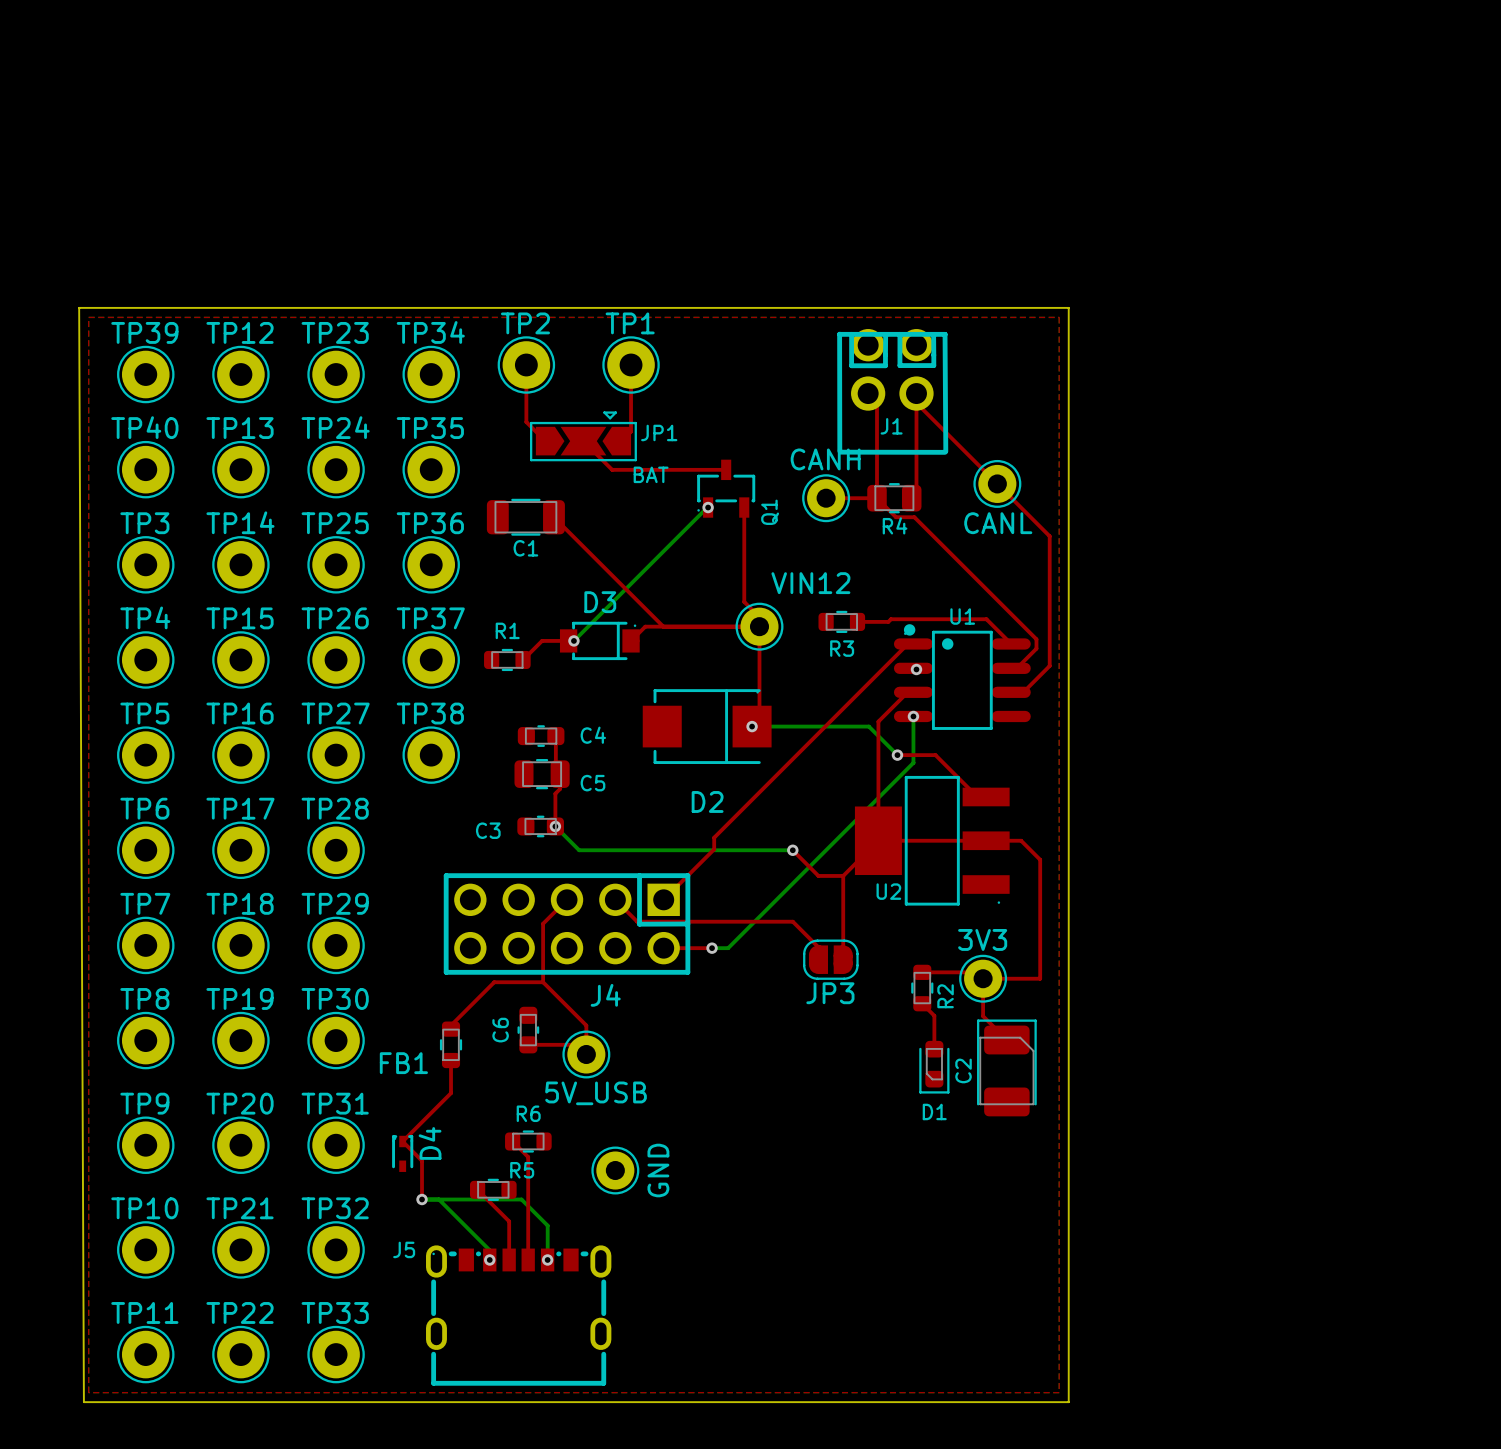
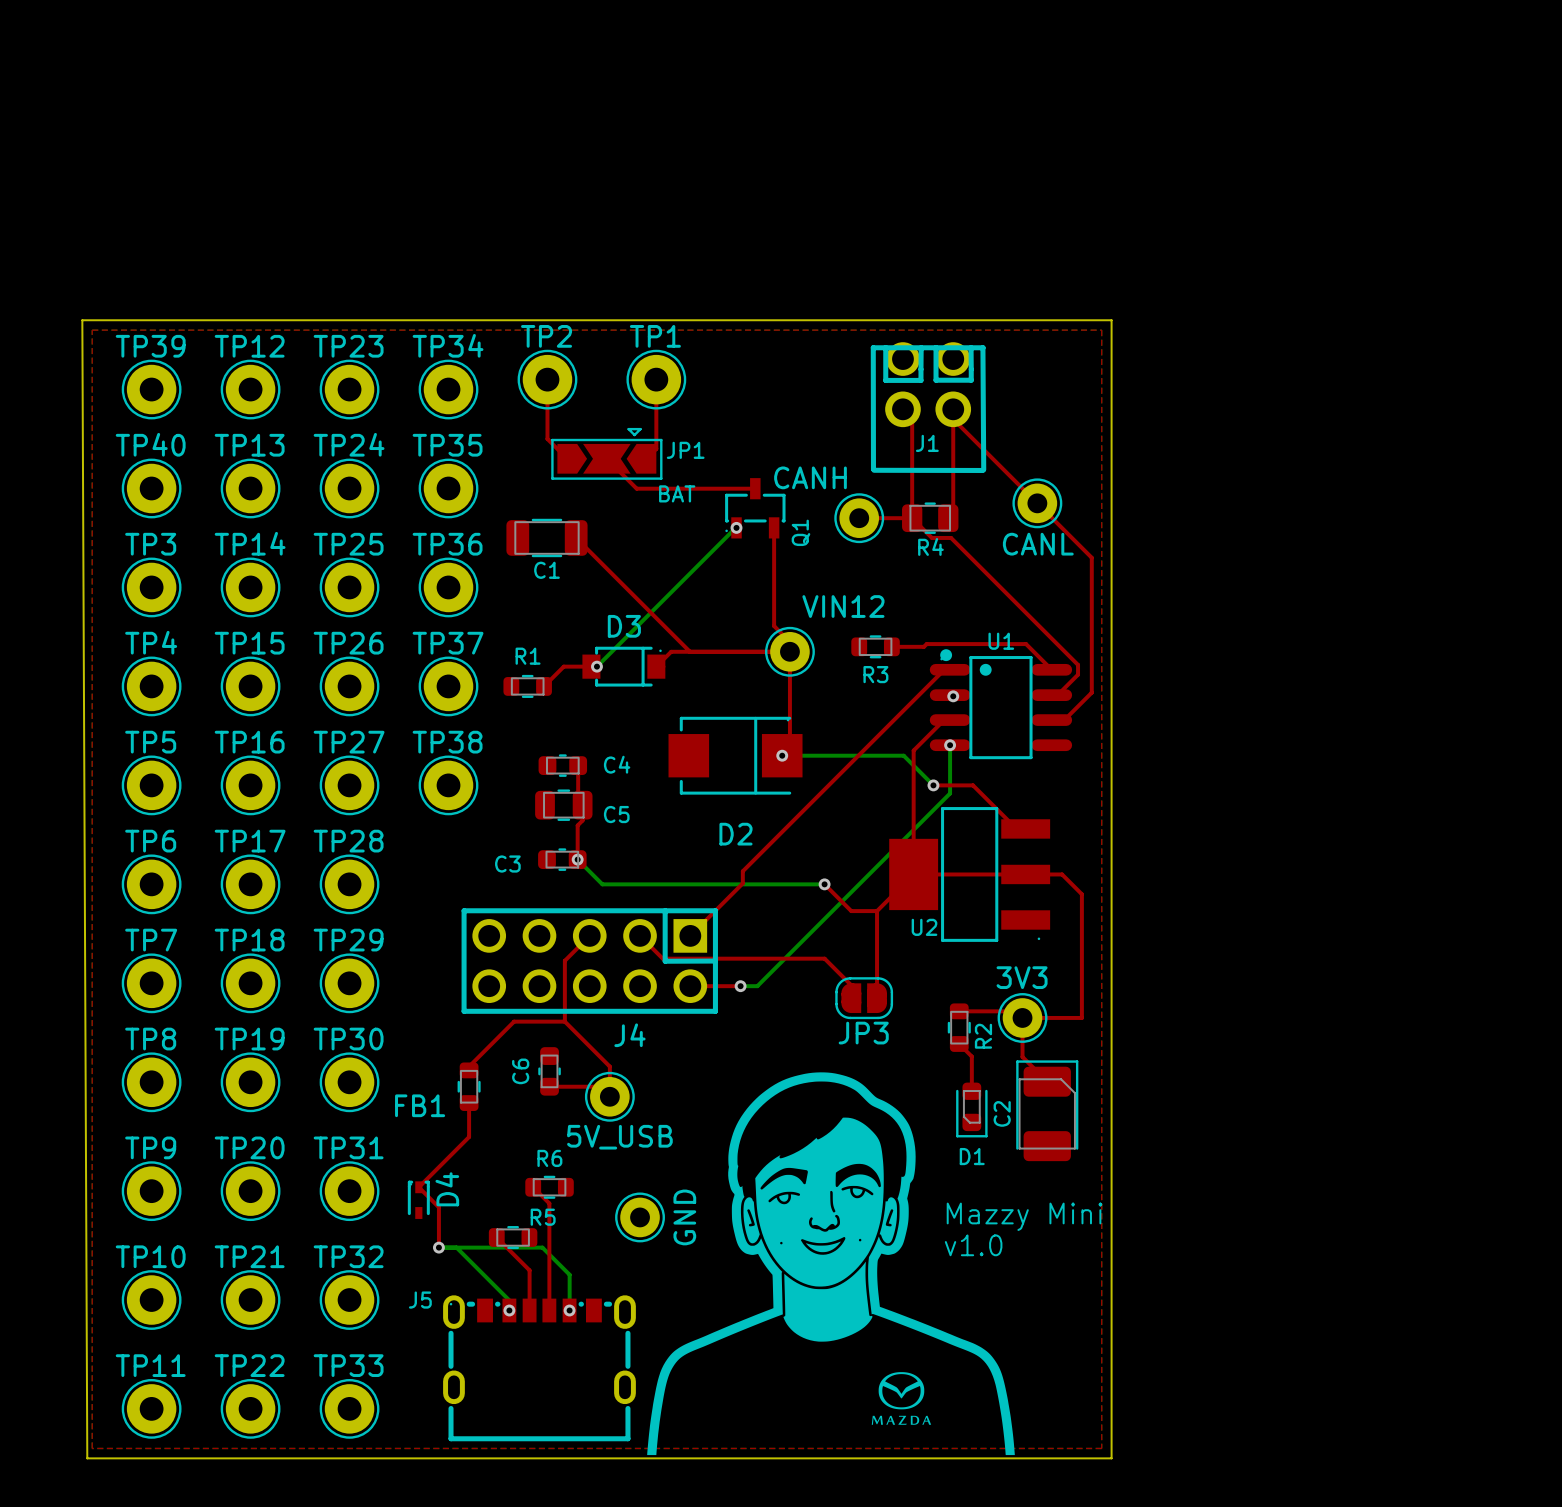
part text position: CANH (825, 459) -> CANH (810, 477)
drawing: none -> [647, 1072, 1015, 1456]
text: none -> Mazzy Mini (1024, 1216)
text: none -> v1.0 (973, 1245)

